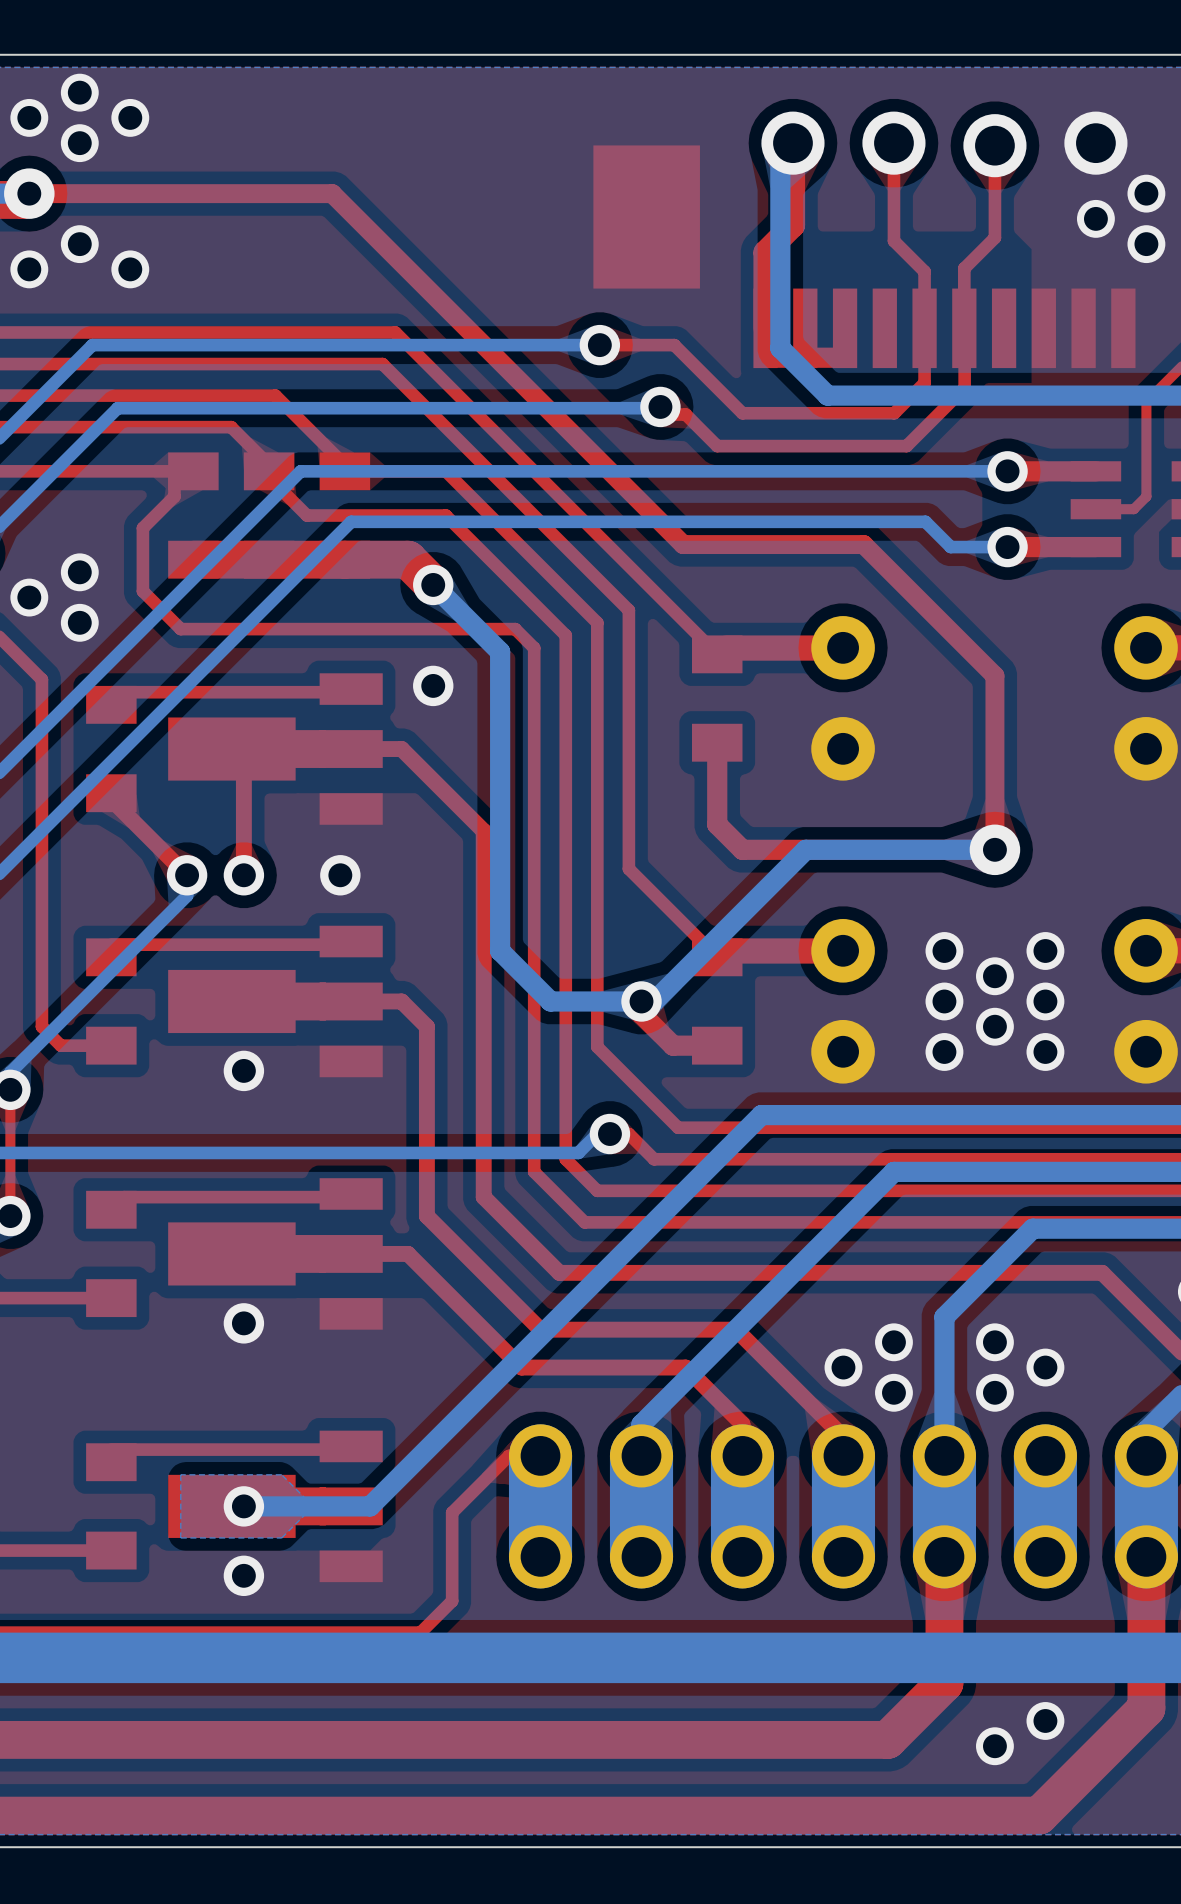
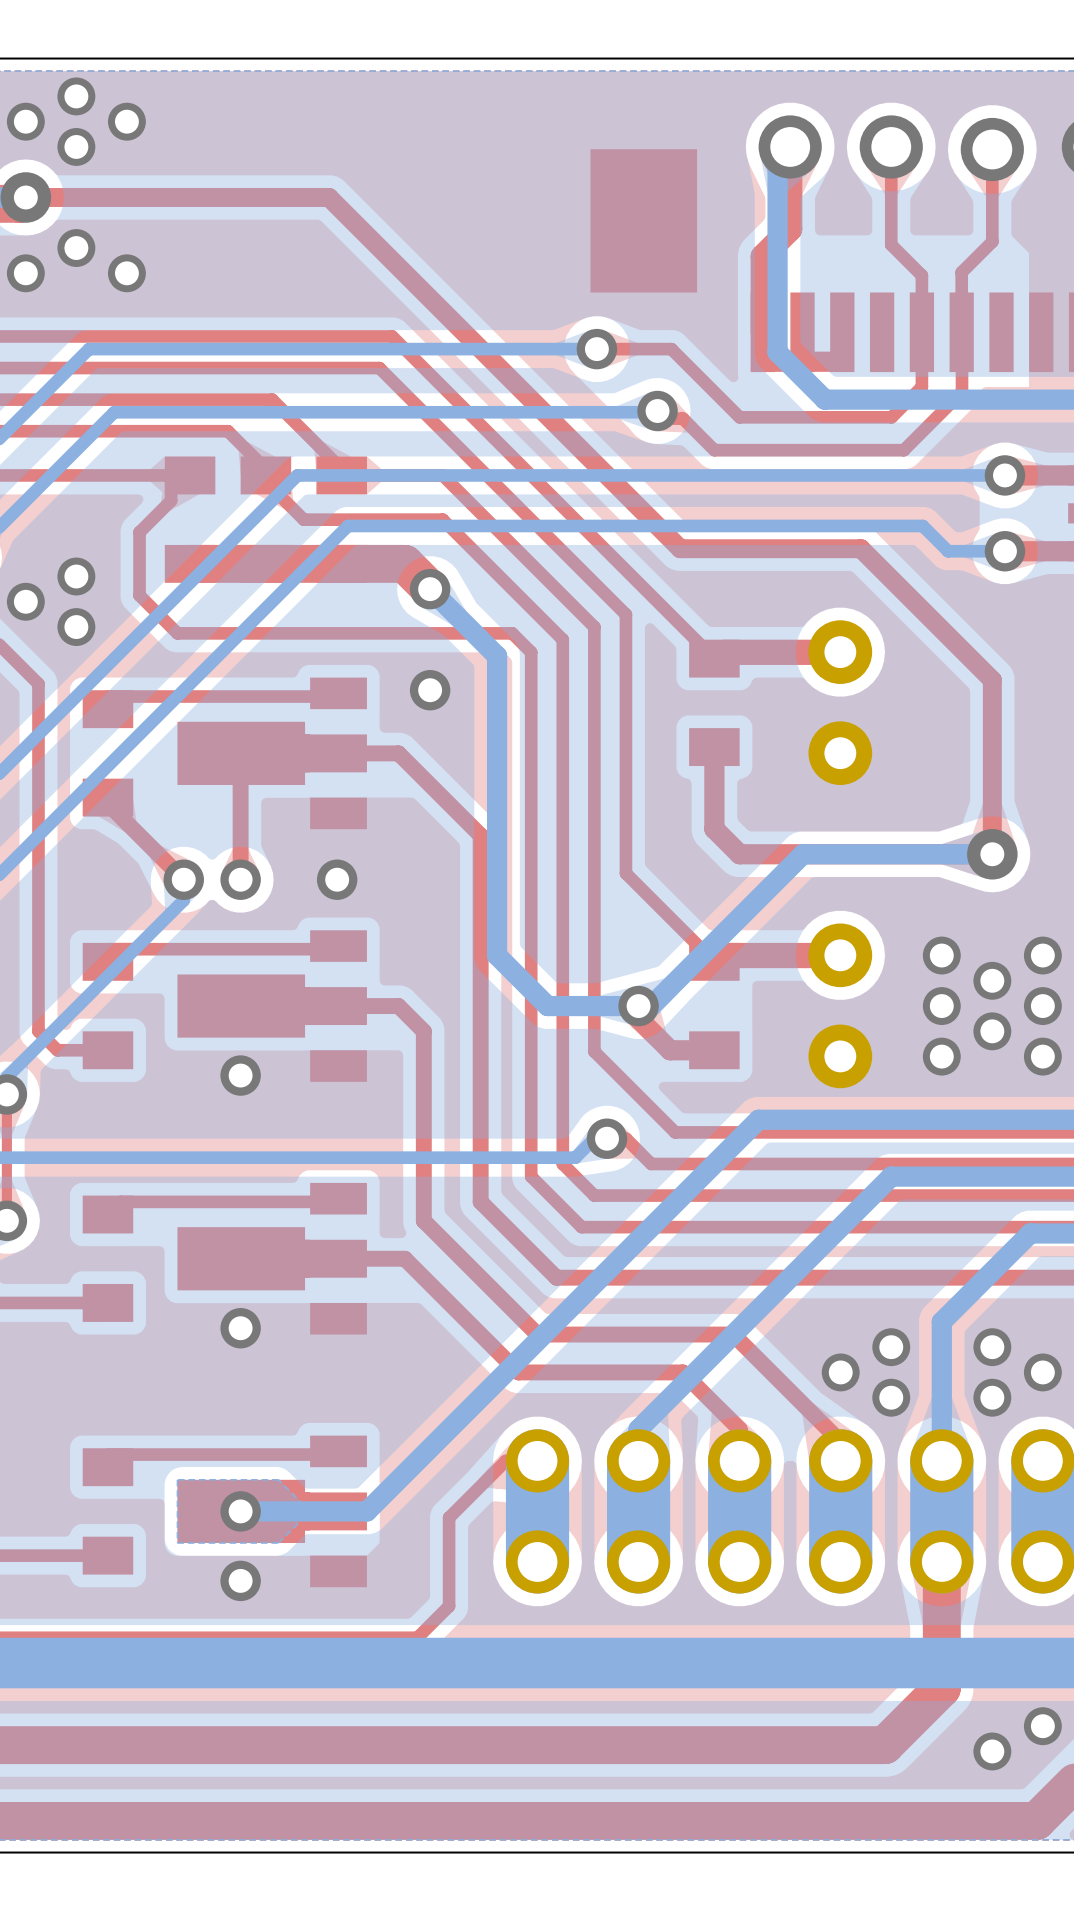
part footprint: [168, 673, 383, 825] -> [177, 677, 367, 830]
part footprint: [168, 925, 383, 1078] -> [177, 930, 367, 1082]
part footprint: [168, 1178, 383, 1330] -> [177, 1182, 367, 1335]
part footprint: [168, 1430, 383, 1583] -> [177, 1435, 367, 1588]

